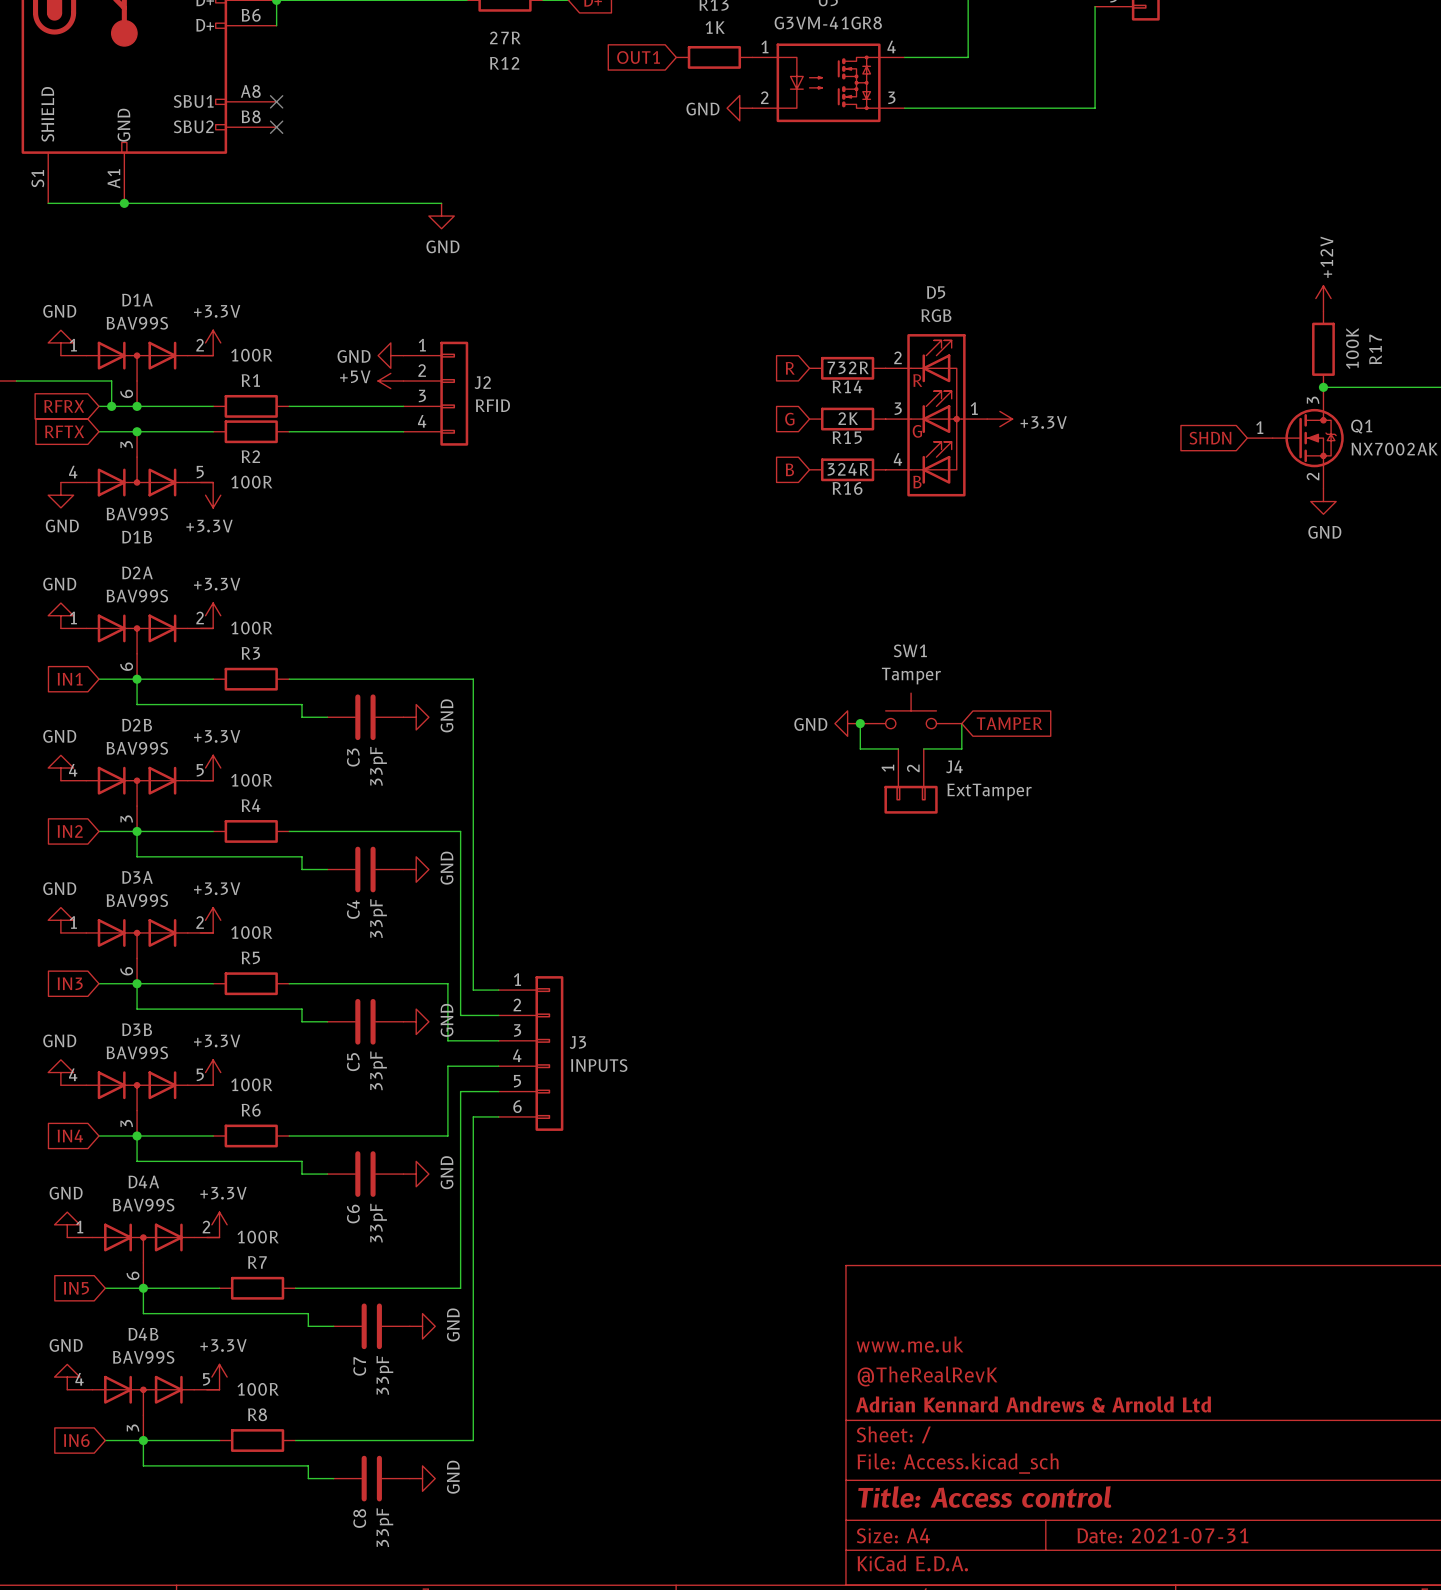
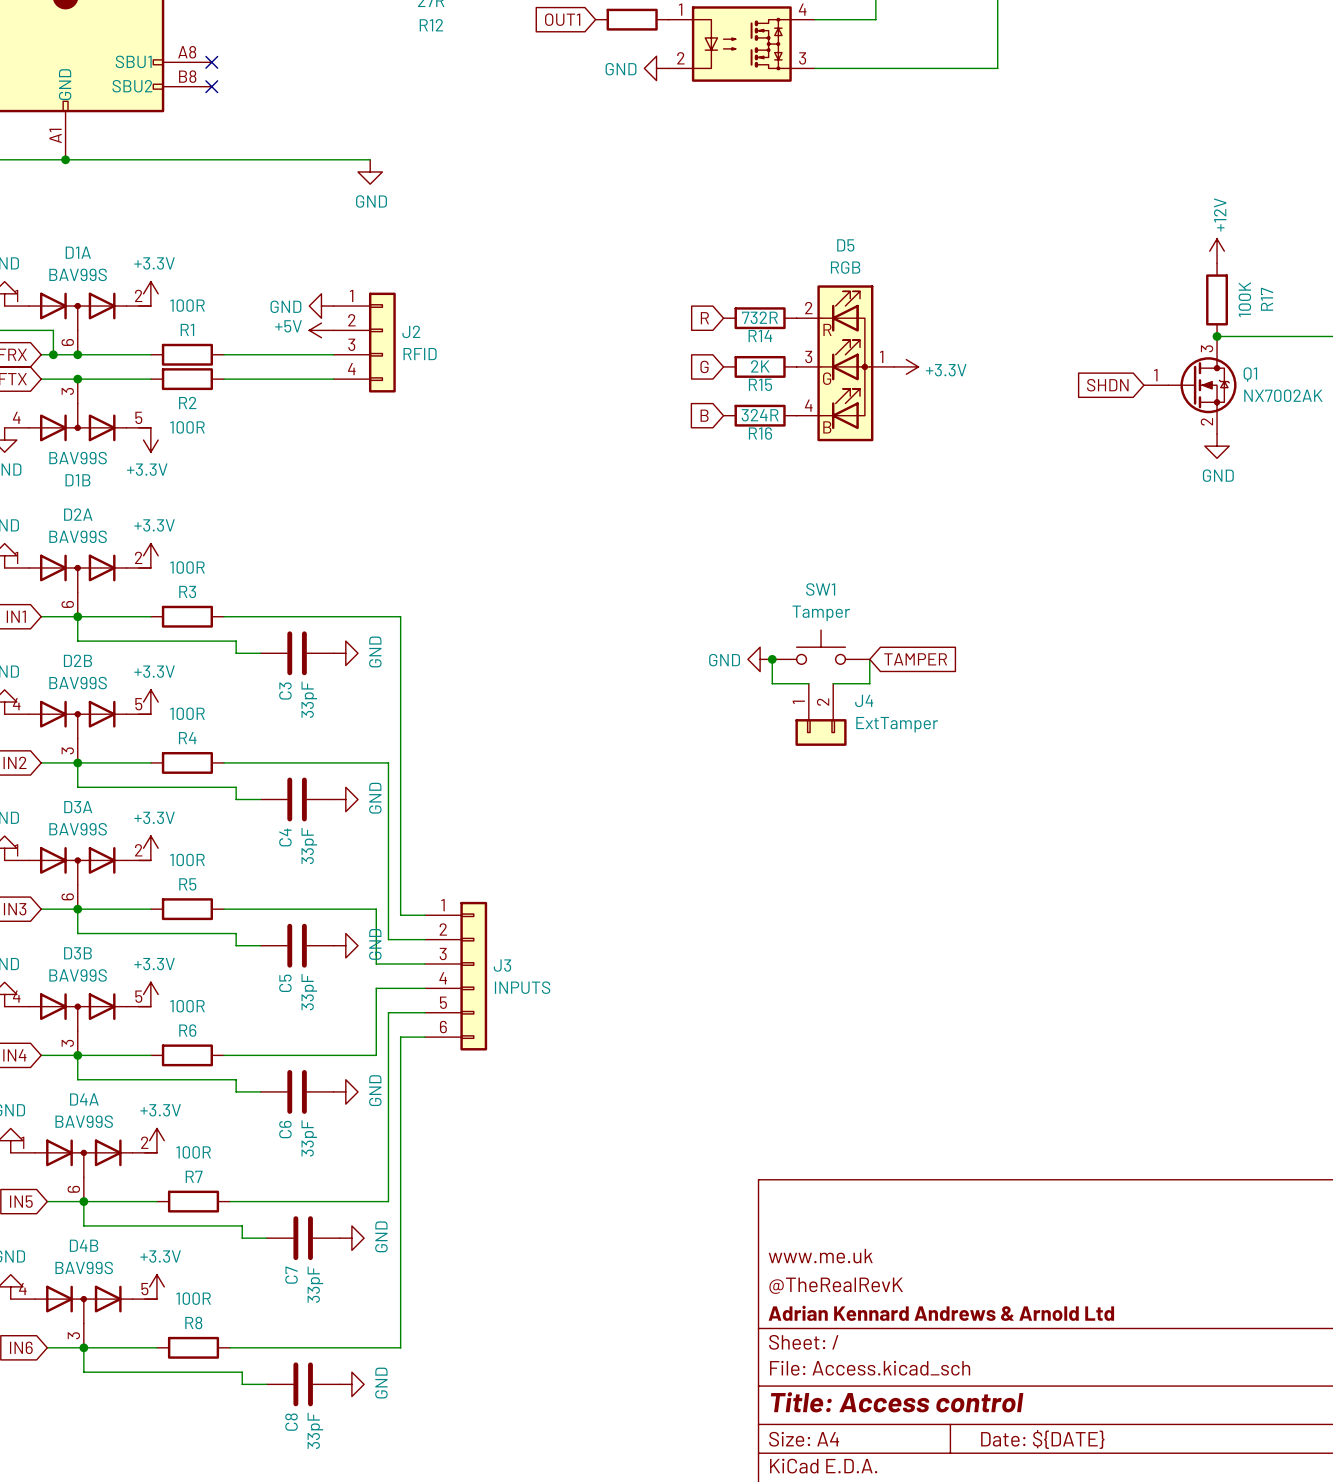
title block: Date: 2021-07-31 (1162, 1535) -> Date: ${DATE} (1042, 1439)

